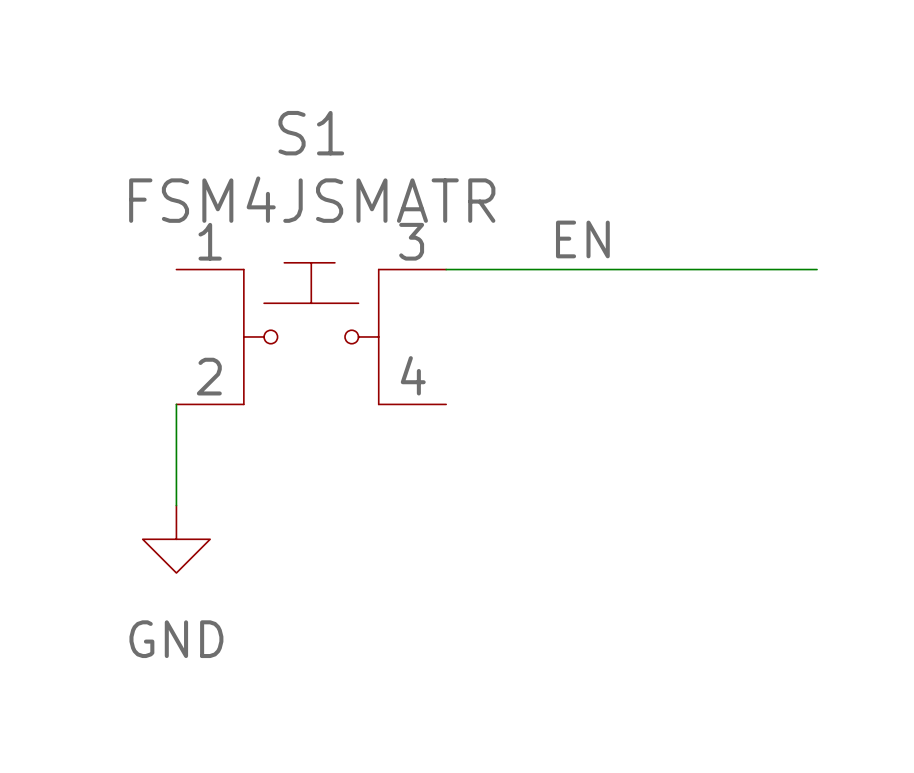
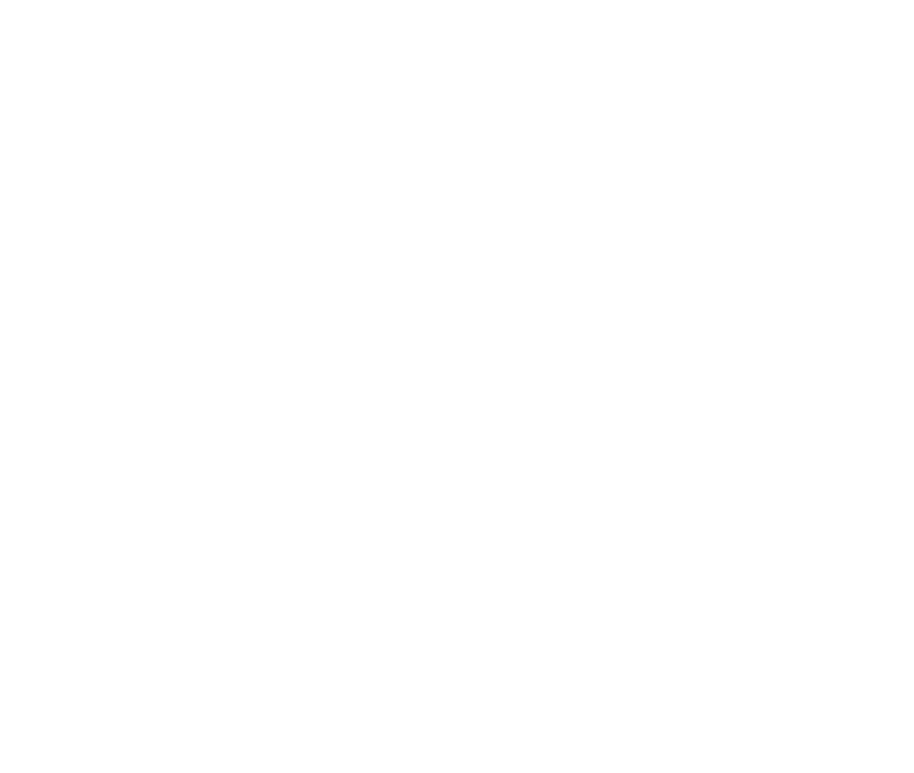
label: EN (582, 239) -> none
wire: (446, 269) (817, 269) -> none
S1: FSM4JSMATR (311, 333) -> none
wire: (176, 404) (176, 505) -> none
power symbol: GND (176, 539) -> none

